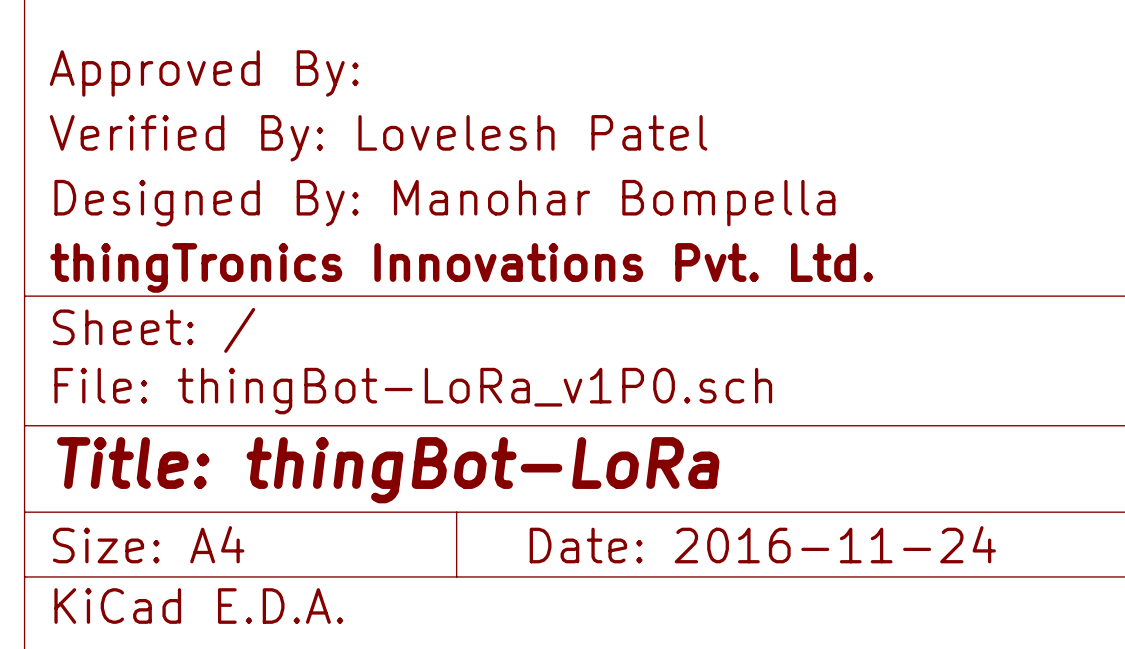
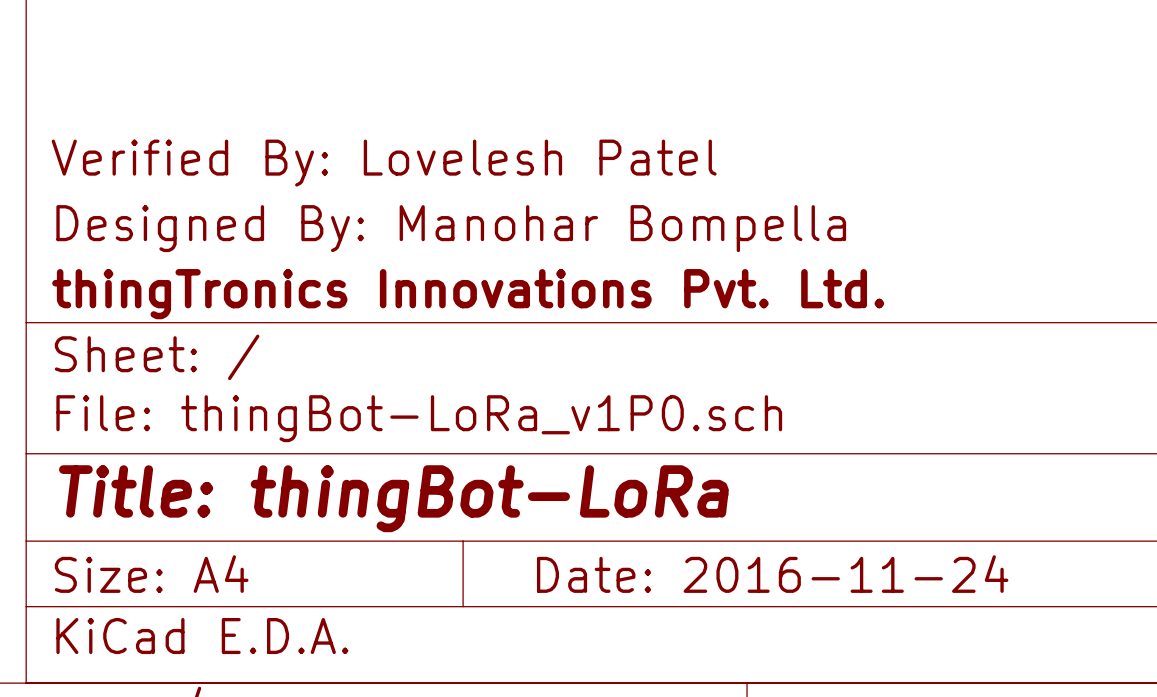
title block: Approved By: (204, 73) -> none

